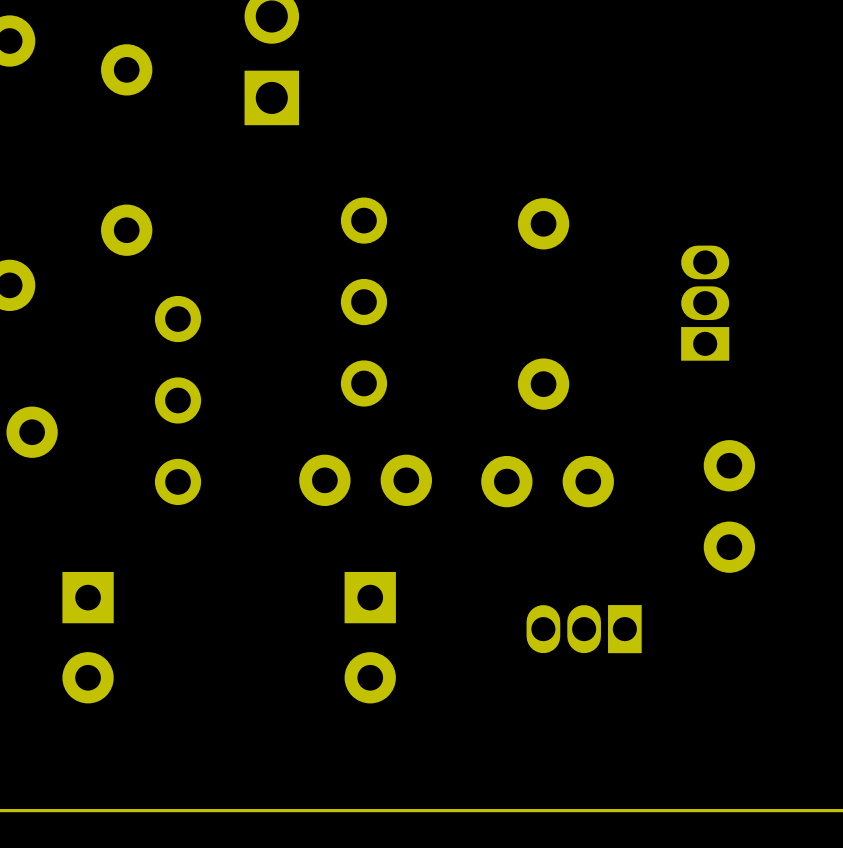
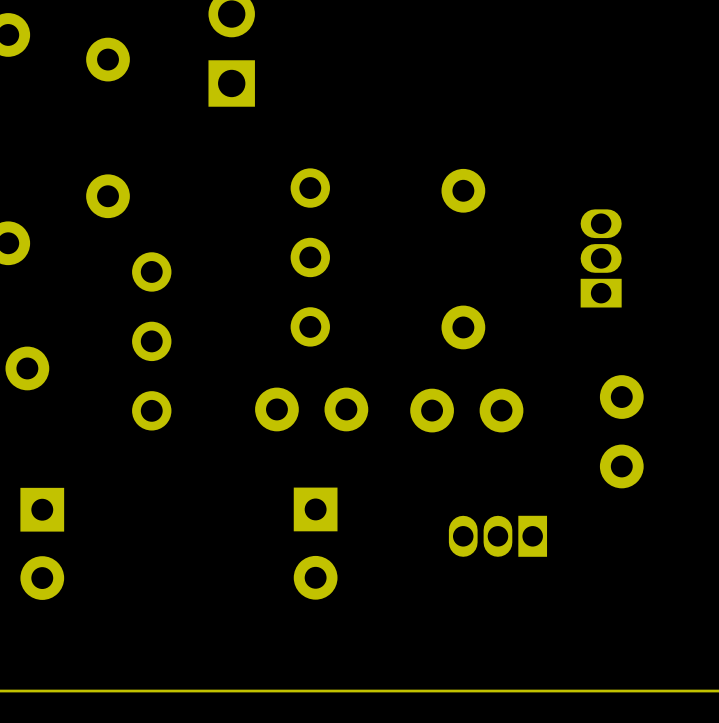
part position: (88, 637) -> (42, 543)

